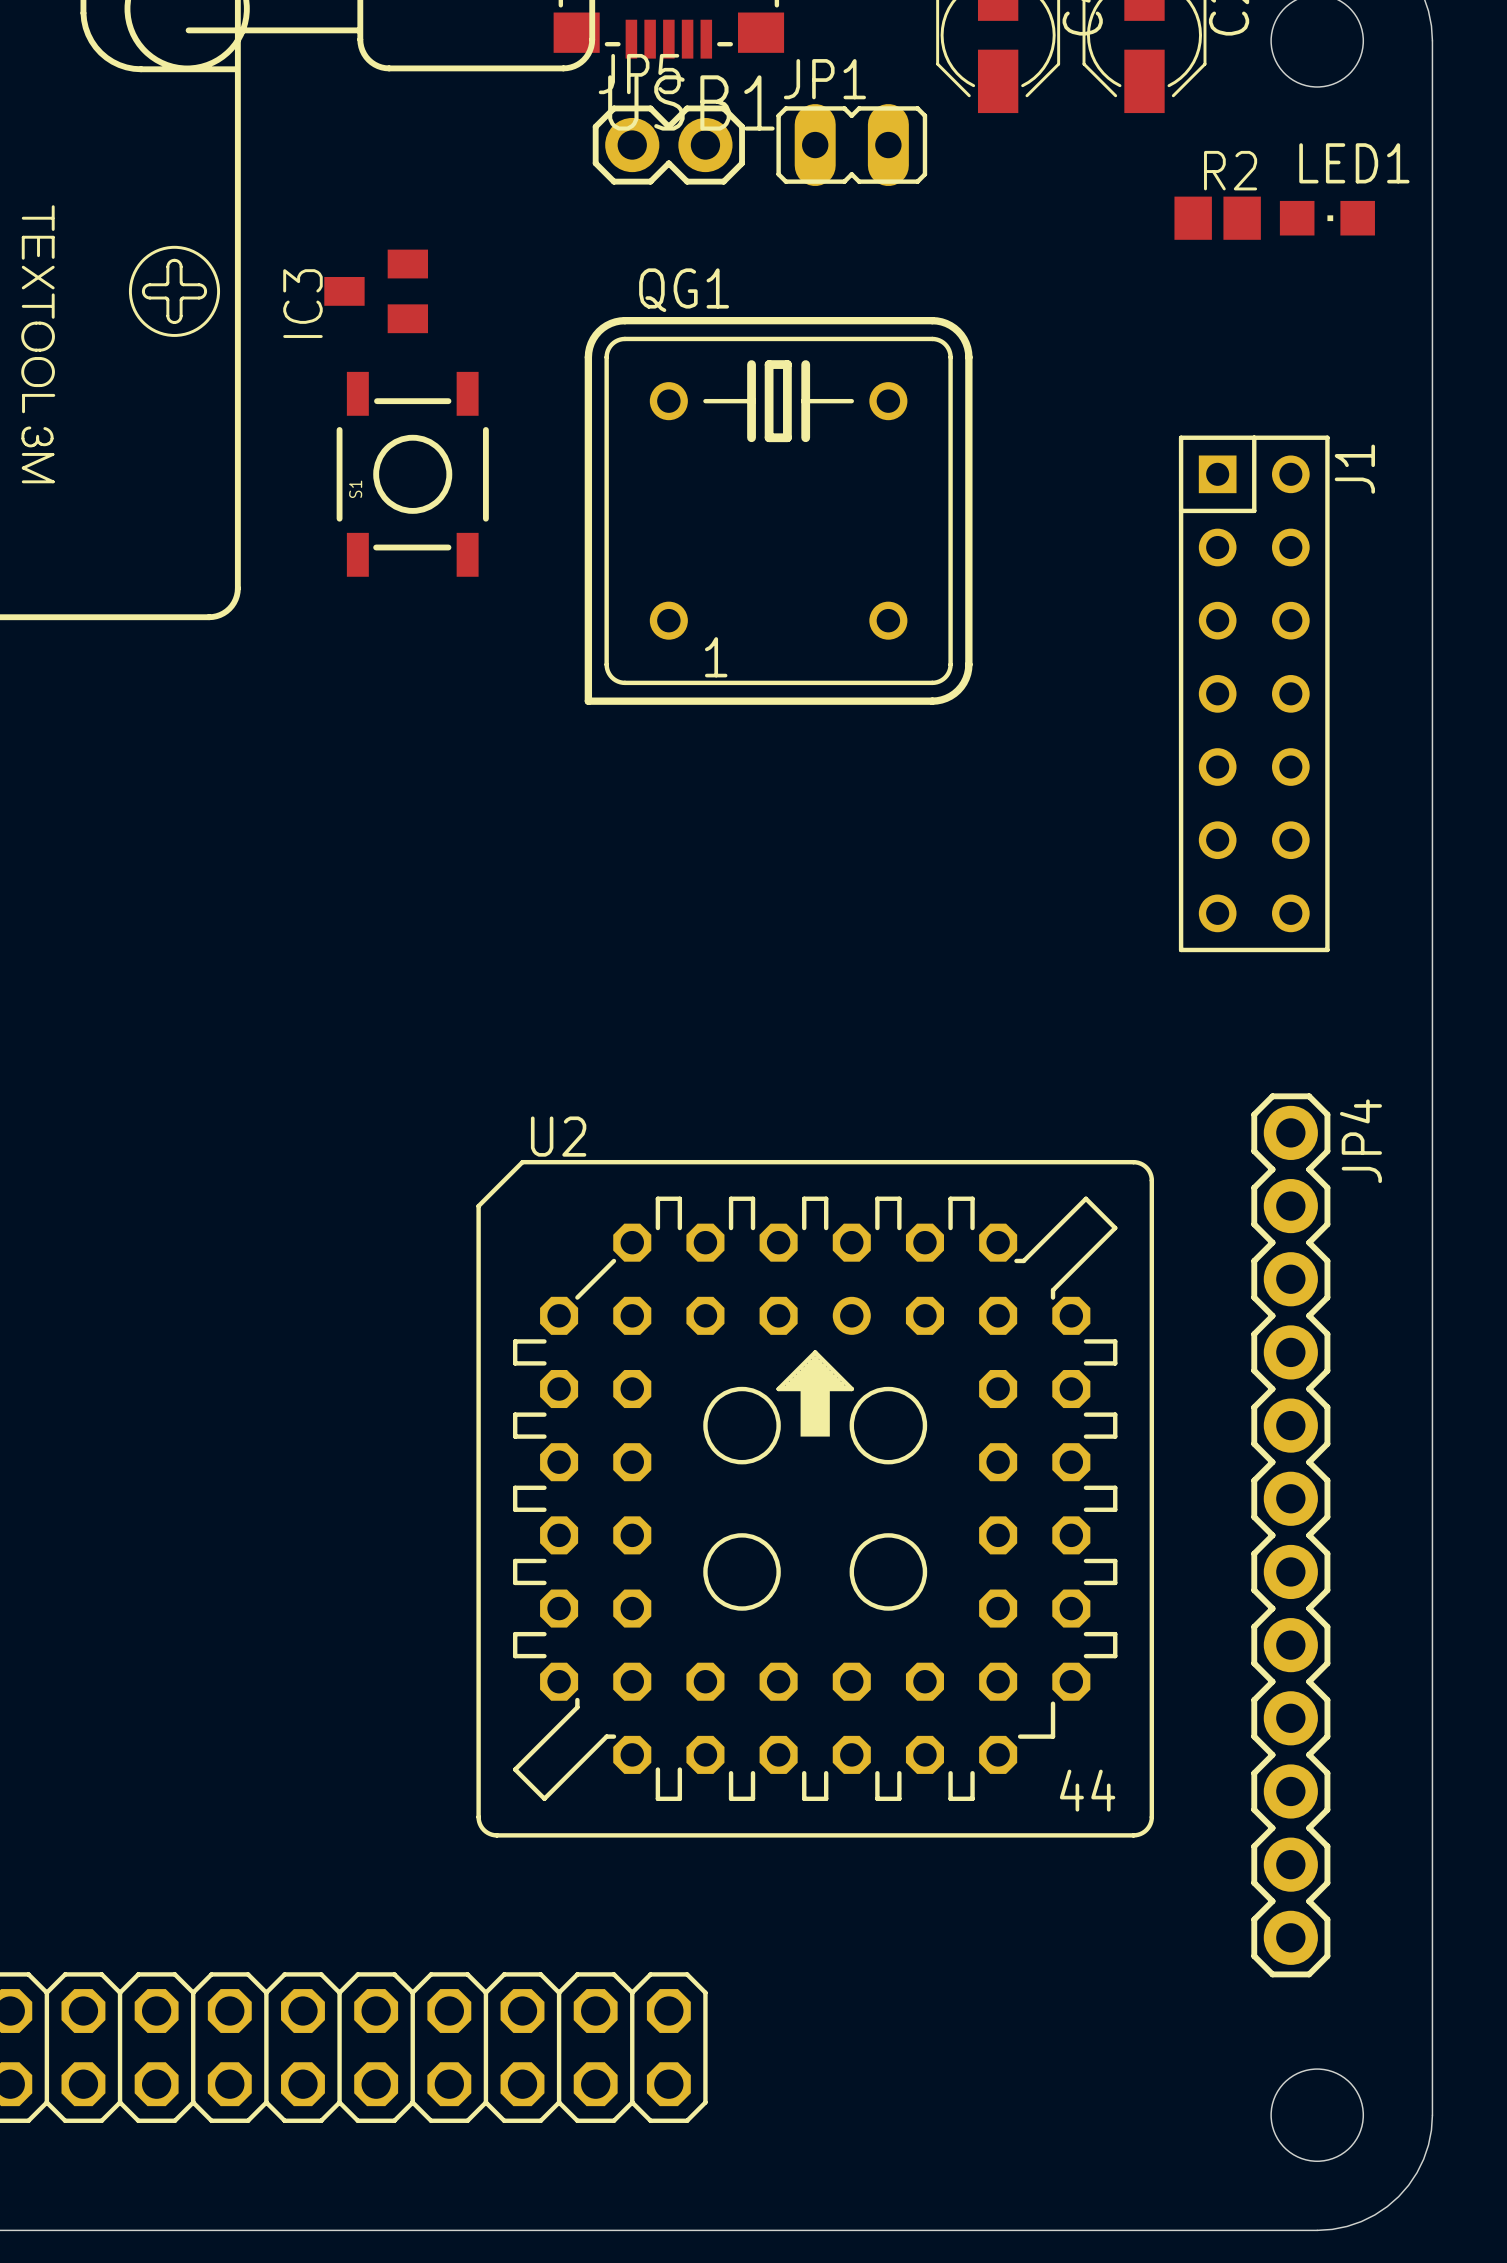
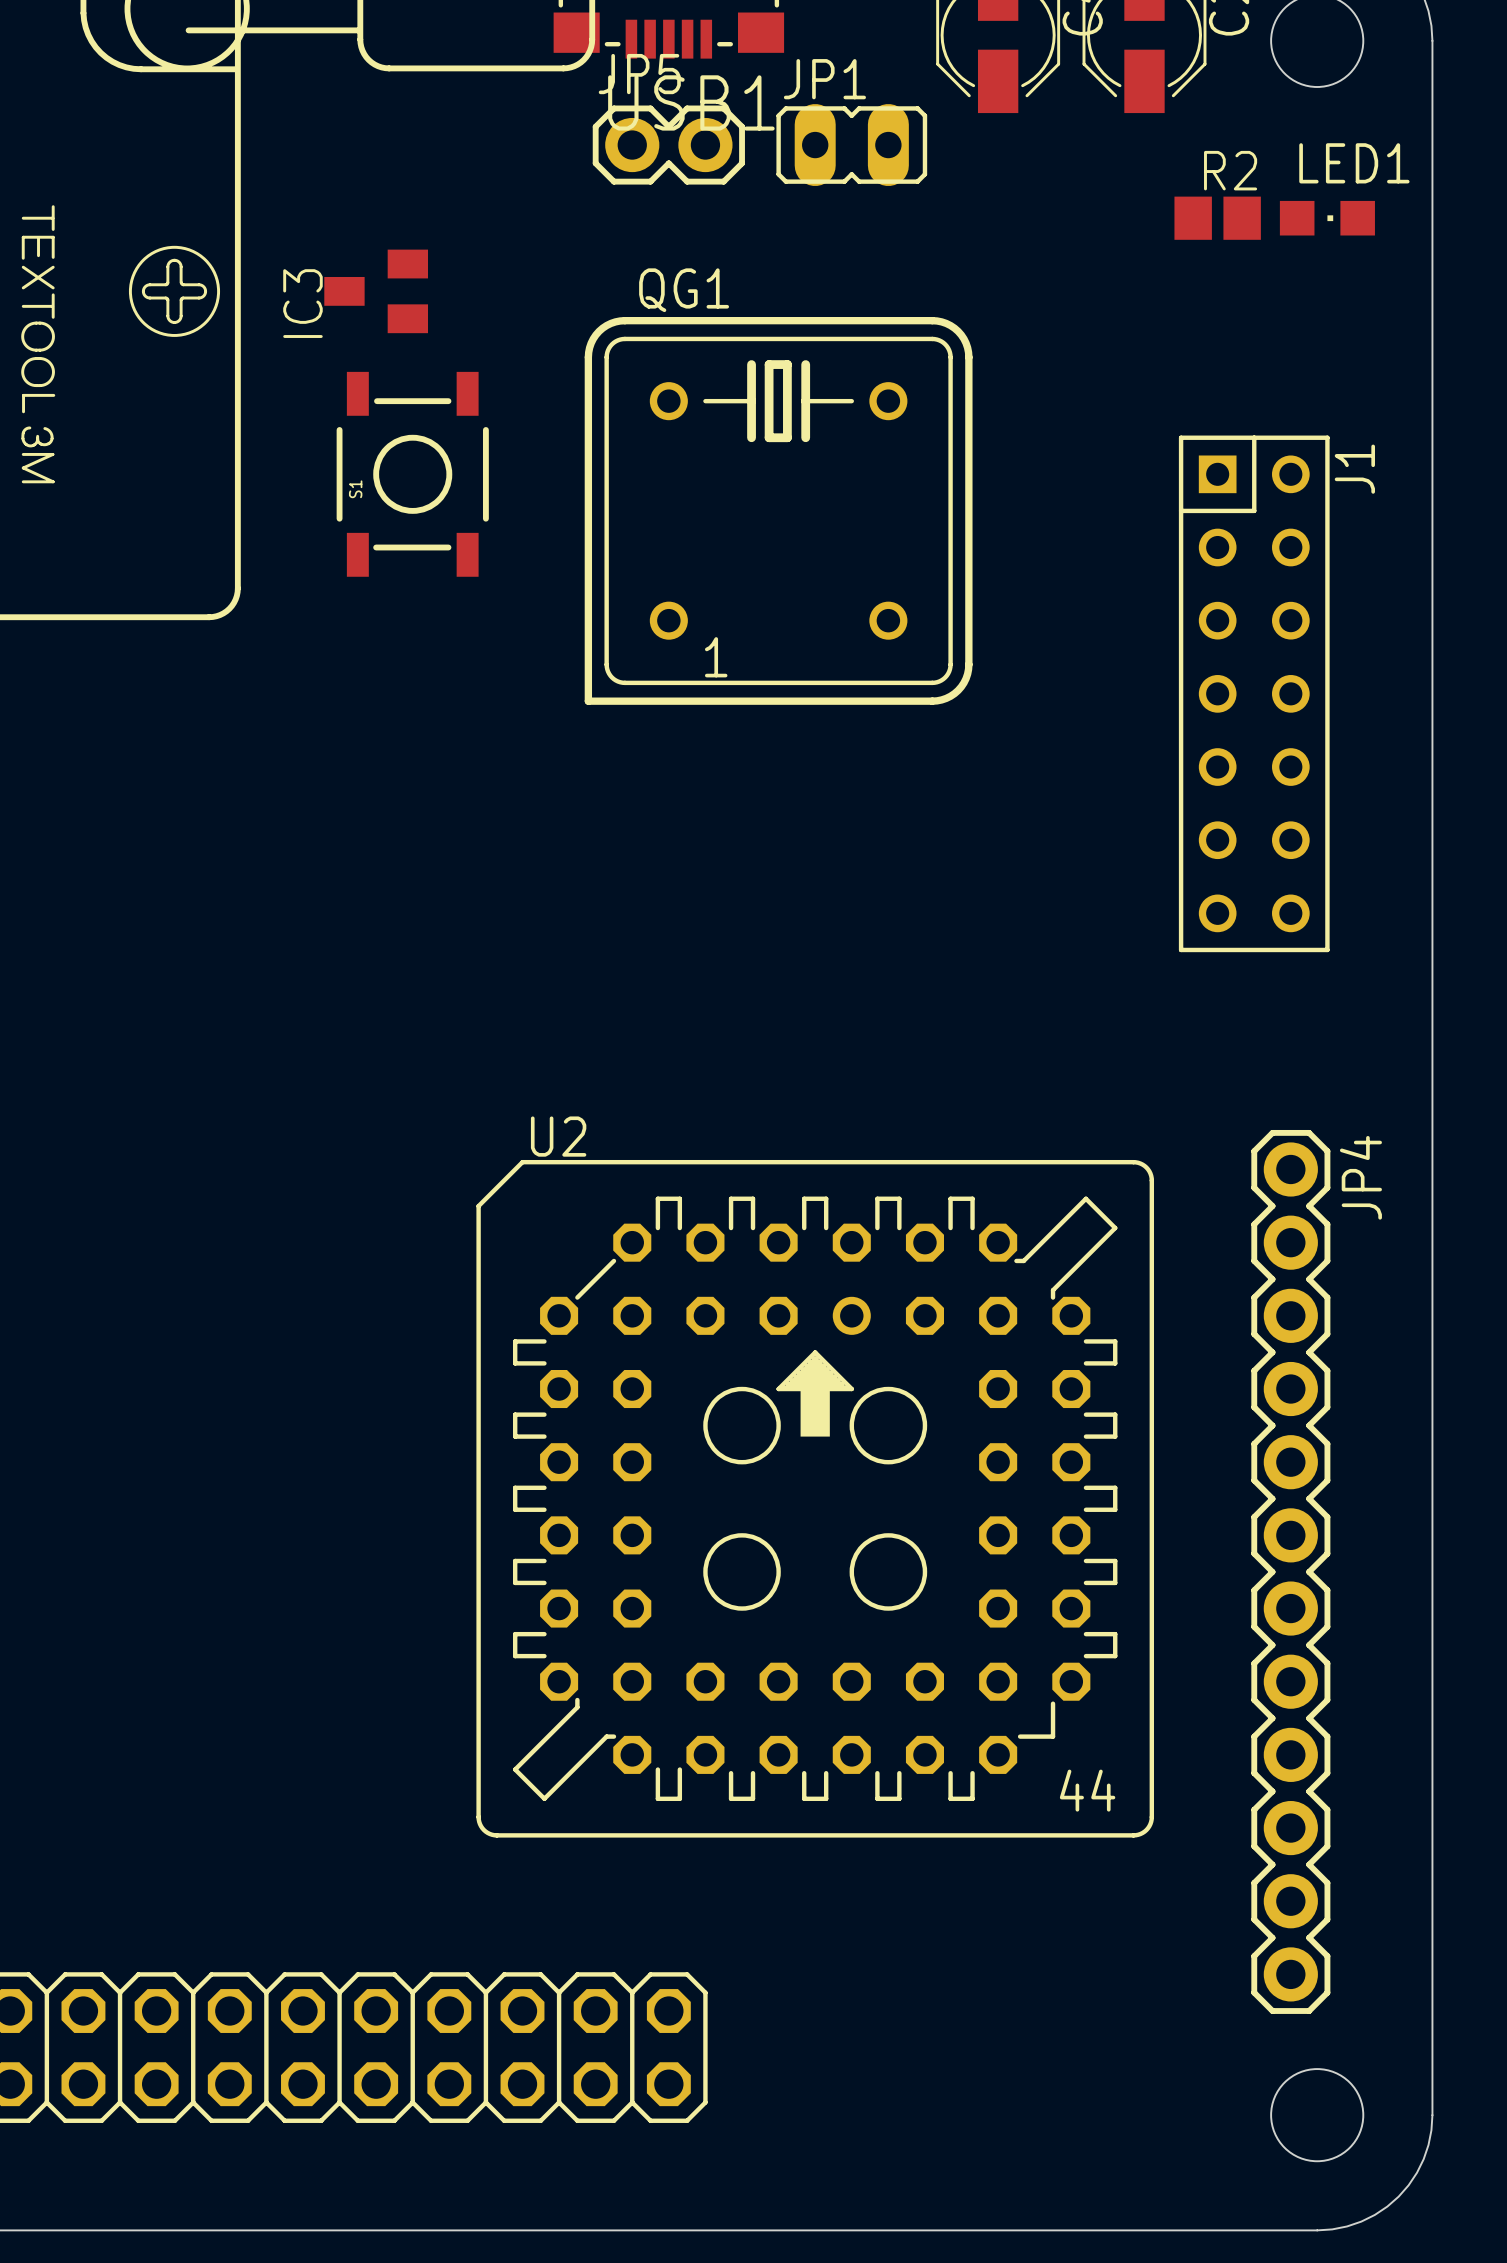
JP4 position: (1290, 1535) -> (1290, 1571)

